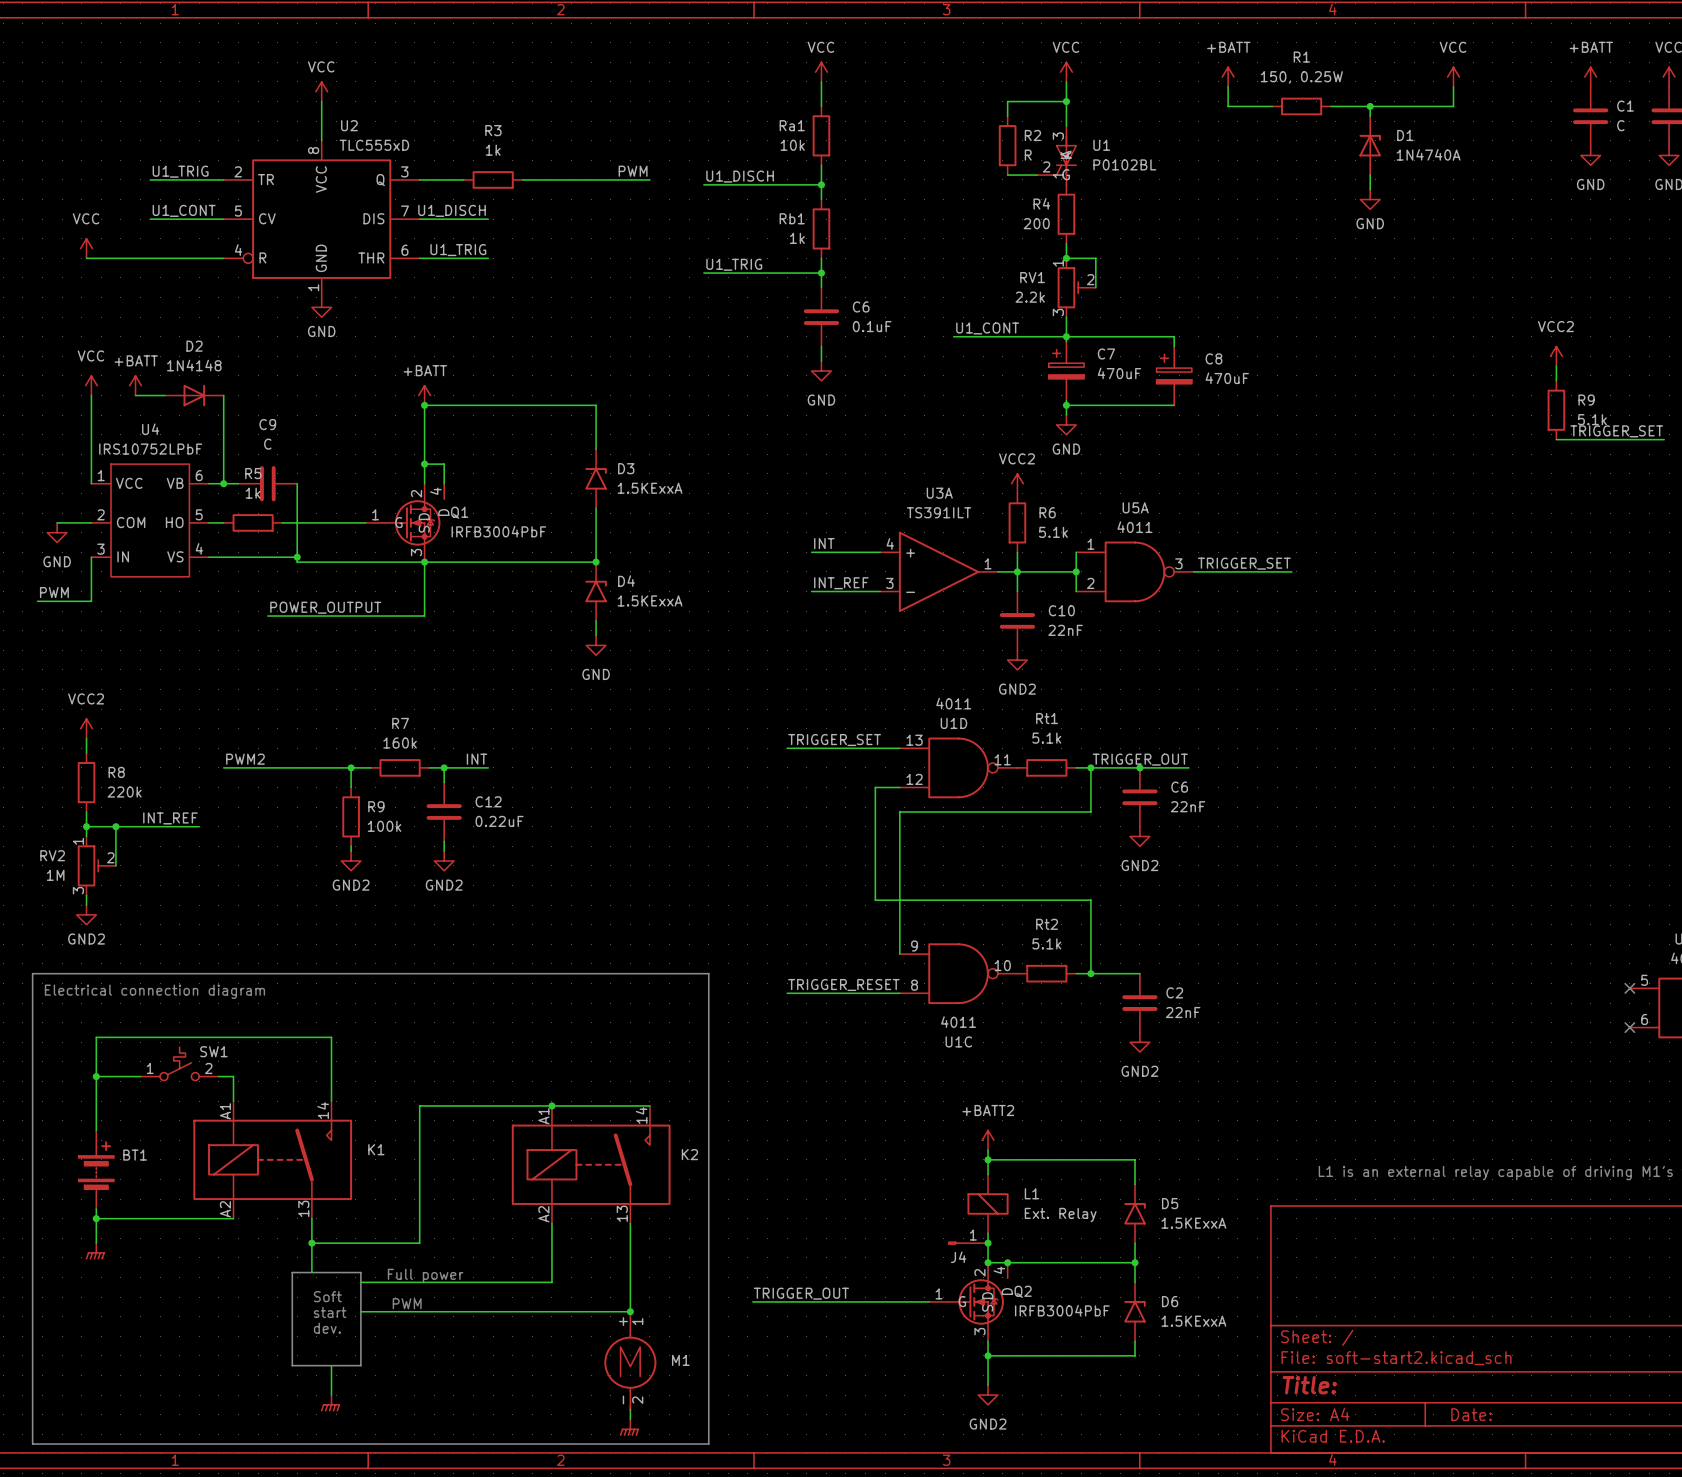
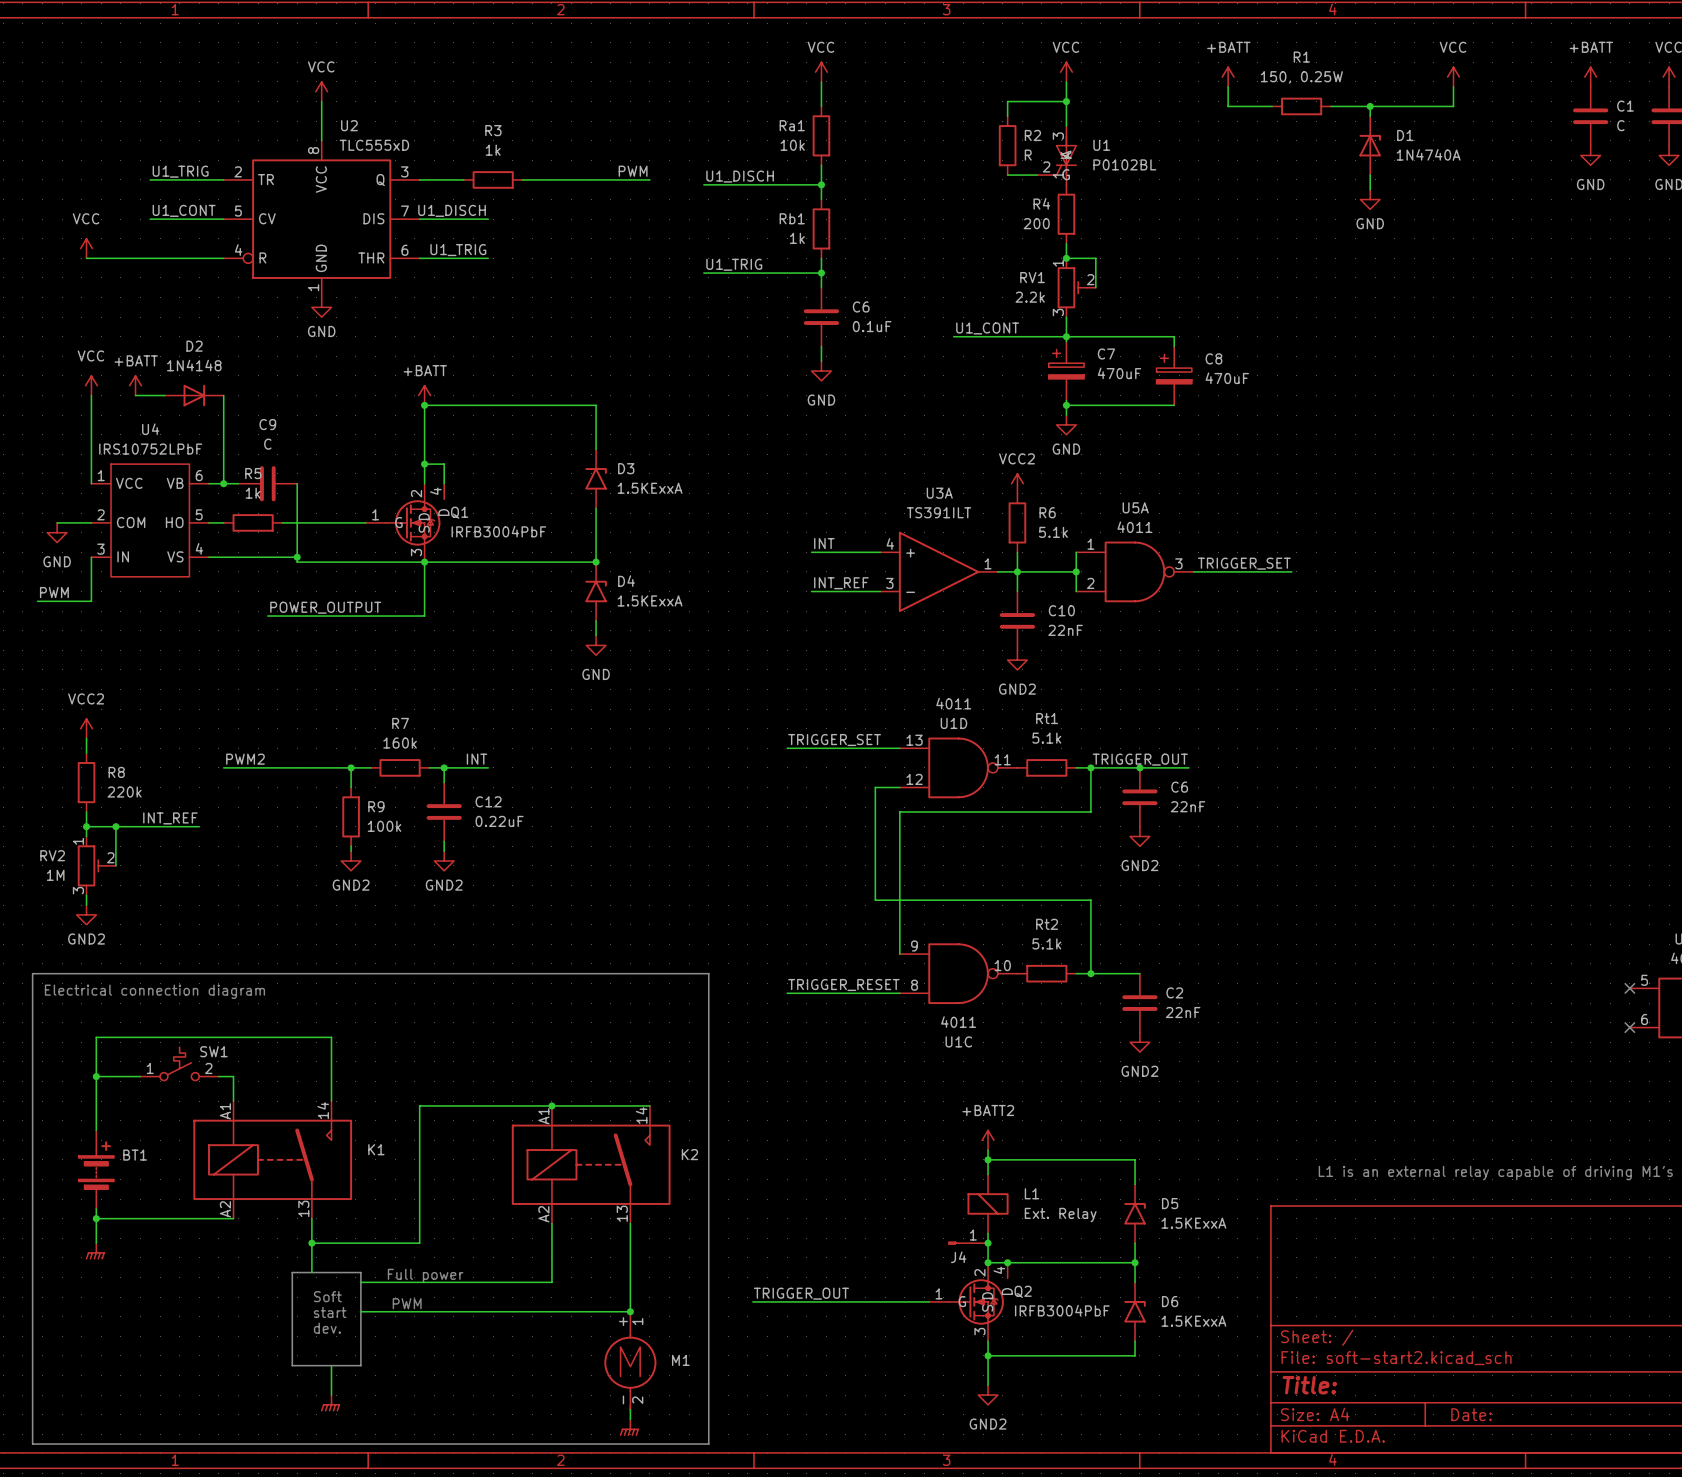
power symbol: VCC2 (1556, 356) -> none
wire: (1556, 366) (1556, 380) -> none
R9: 5.1k (1556, 410) -> none
label: TRIGGER_SET (1616, 431) -> none
wire: (1556, 439) (1664, 439) -> none

